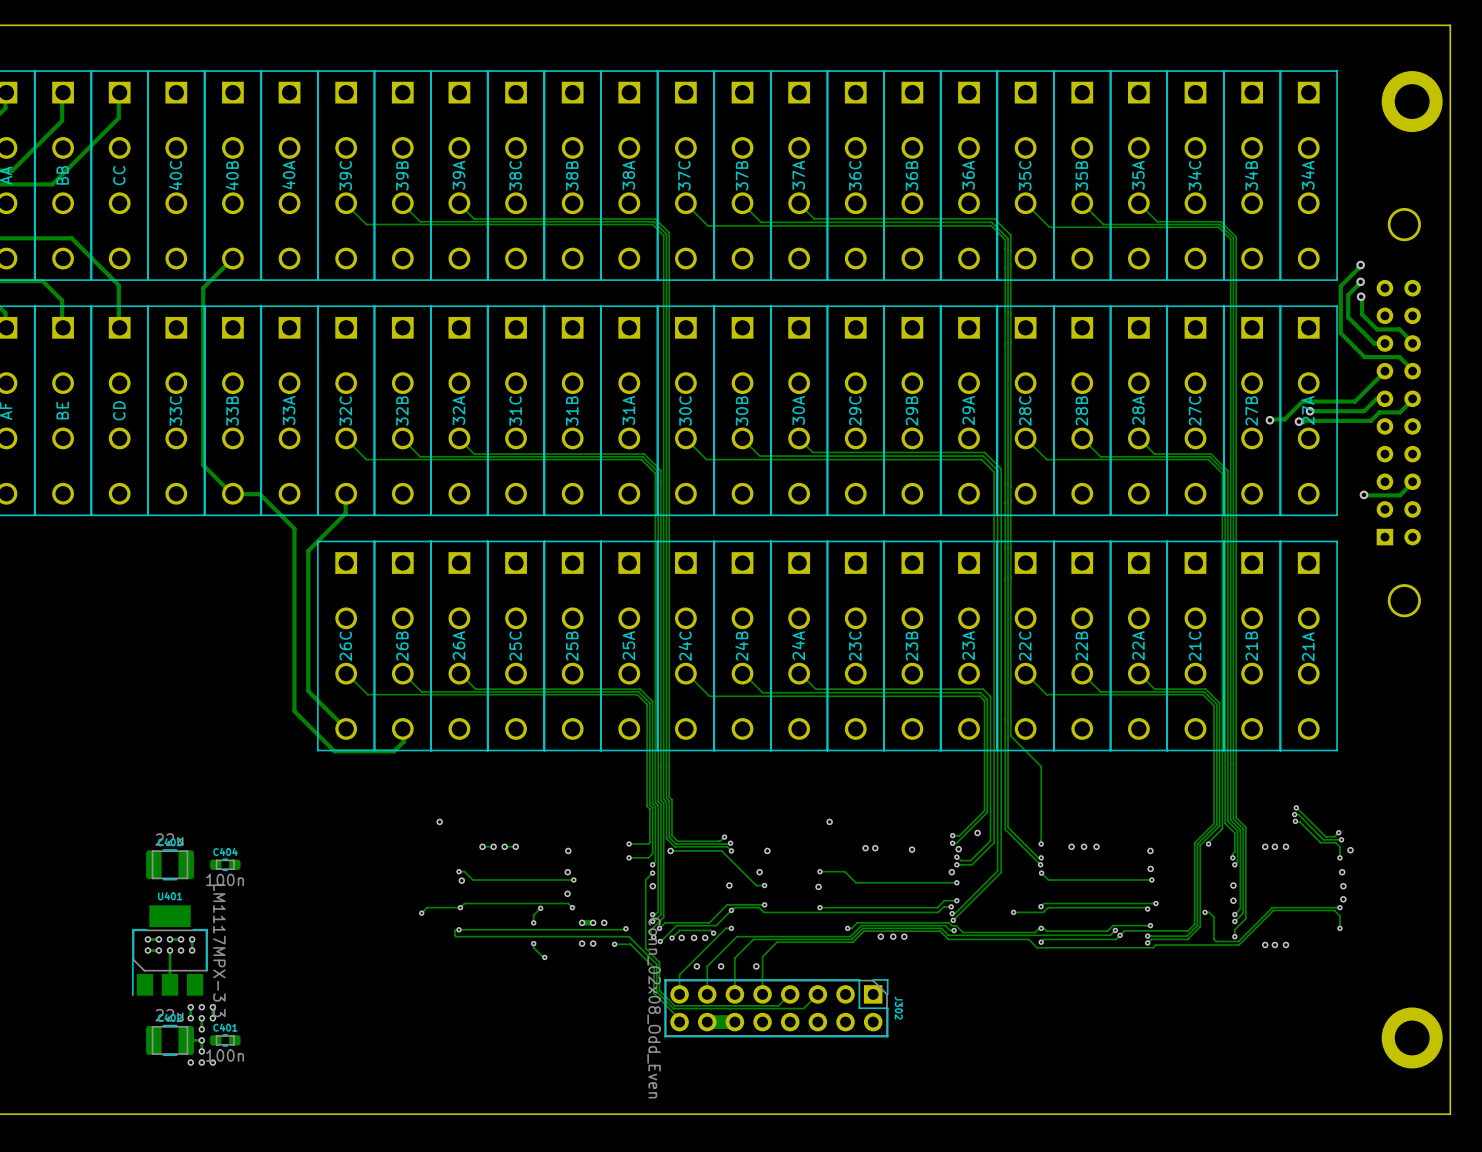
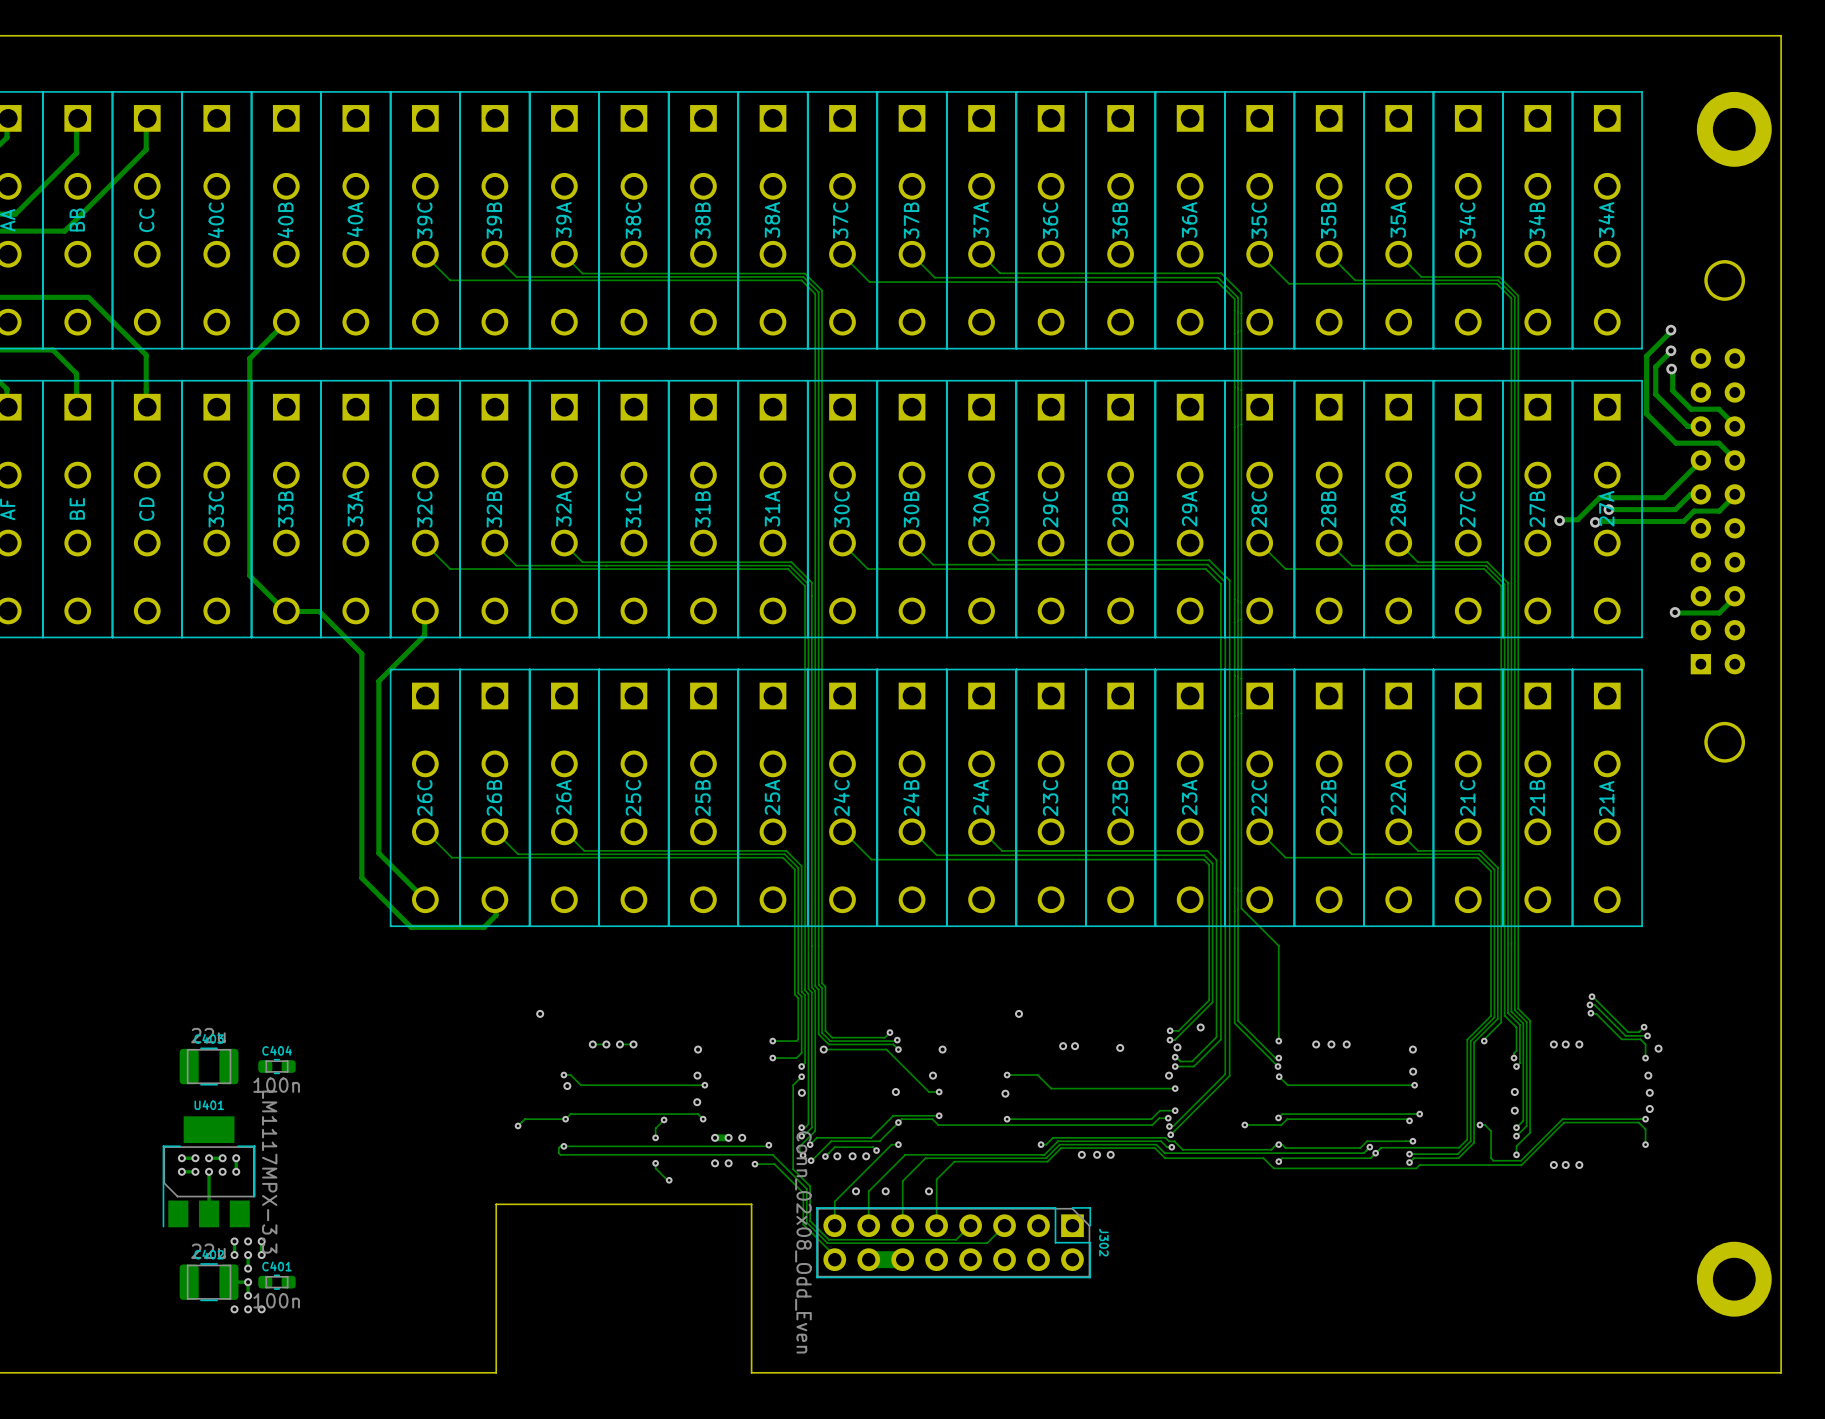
board edge: (611, 1114) (403, 1114) -> (751, 1372) (751, 1204) (496, 1204) (496, 1372)

